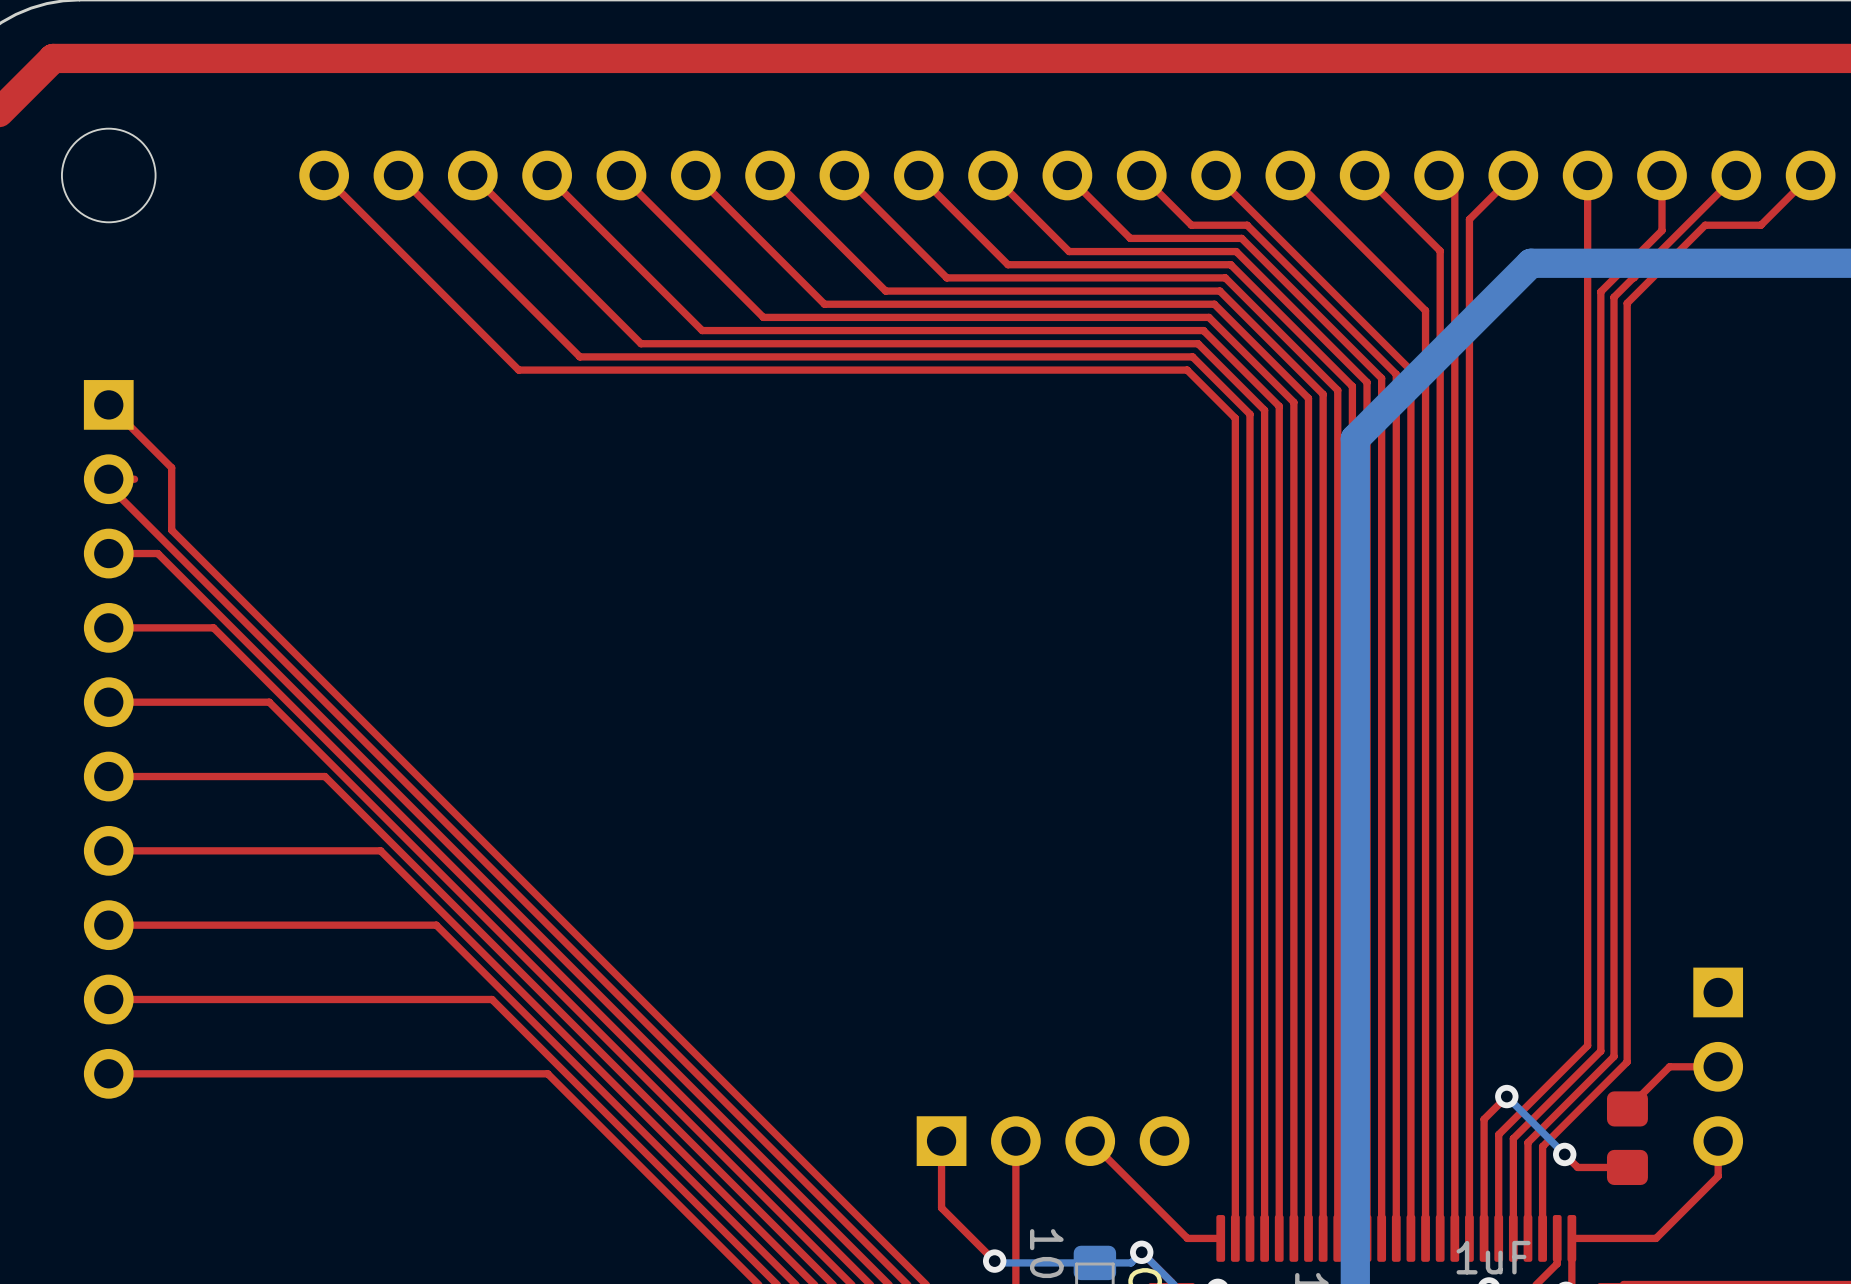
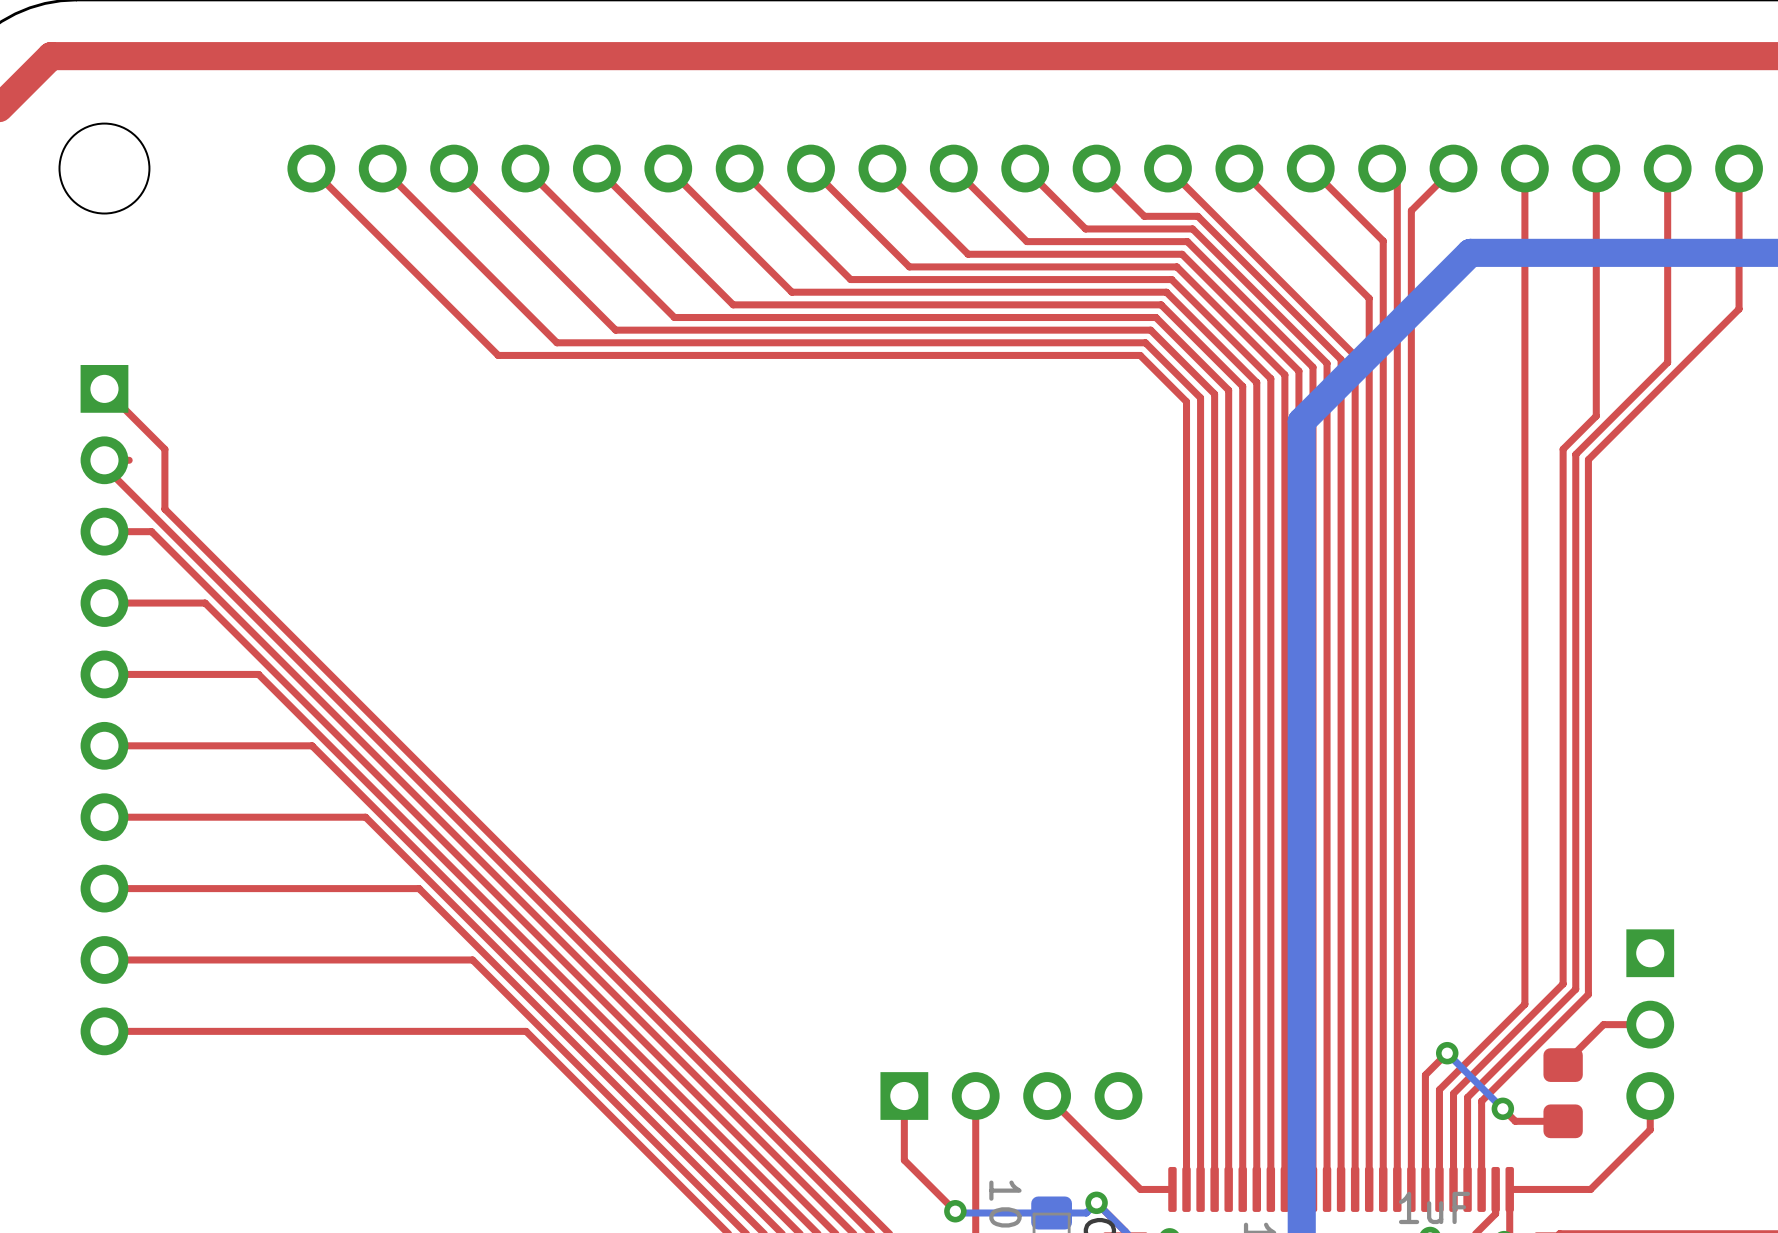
top track: (1736, 175) (1634, 277) -> none
top track: (1810, 175) (1760, 225) (1705, 225) (1627, 303) (1627, 1062) -> (1739, 168) (1739, 309) (1588, 459) (1588, 994) (1562, 1020)
top track: (1661, 230) (1600, 291) (1600, 1051) -> (1596, 221) (1596, 416) (1563, 449) (1563, 983) (1537, 1009)
top track: (1633, 277) (1614, 297) (1614, 1056) -> (1667, 168) (1667, 362) (1575, 454) (1575, 989) (1550, 1014)

